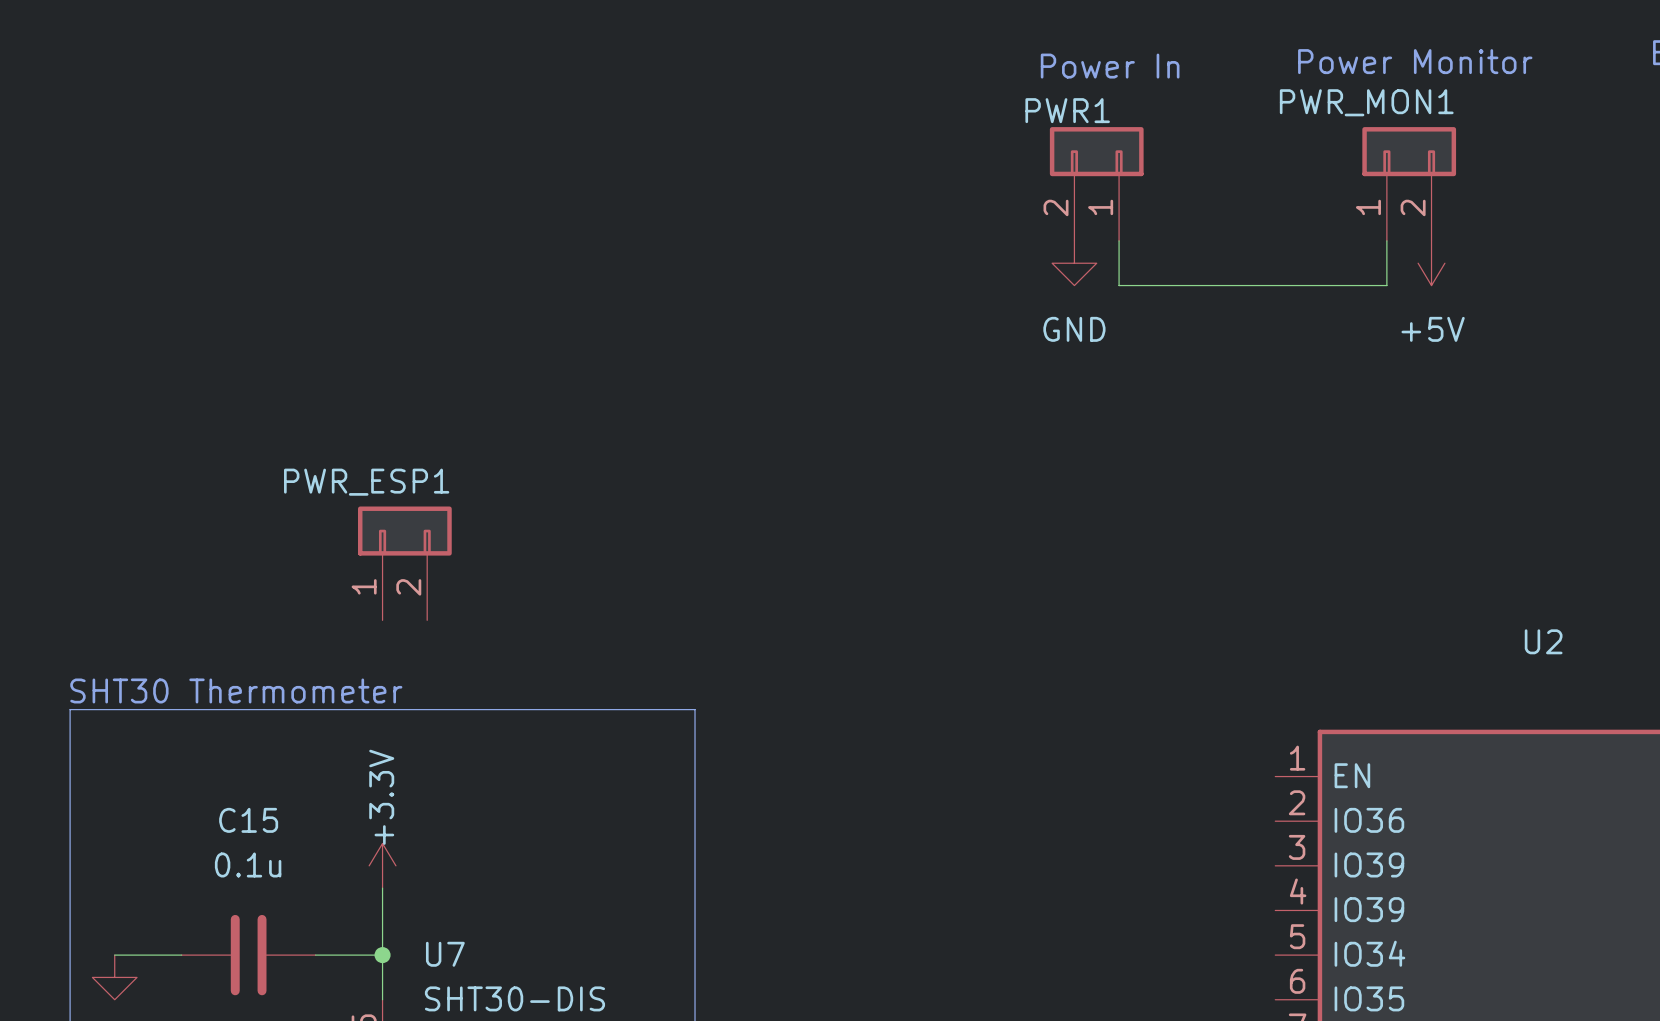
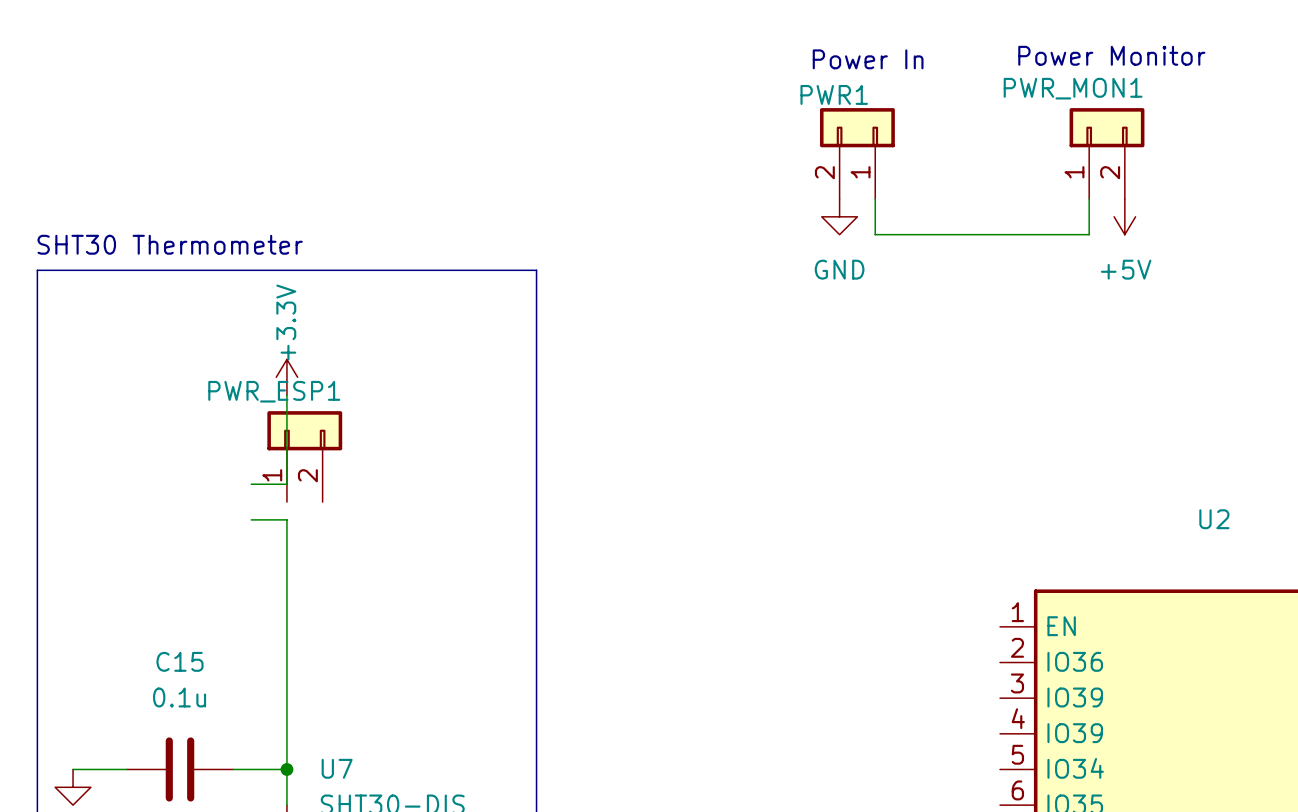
wire: none -> (286, 395) (286, 484) (251, 484)
wire: none -> (251, 519) (286, 519) (286, 715)
text position: SHT30 Thermometer (236, 690) -> SHT30 Thermometer (170, 244)
line: (70, 709) (695, 709) -> (37, 573) (37, 270) (536, 270) (536, 573)
power symbol position: +3.3V (382, 865) -> +3.3V (286, 377)

